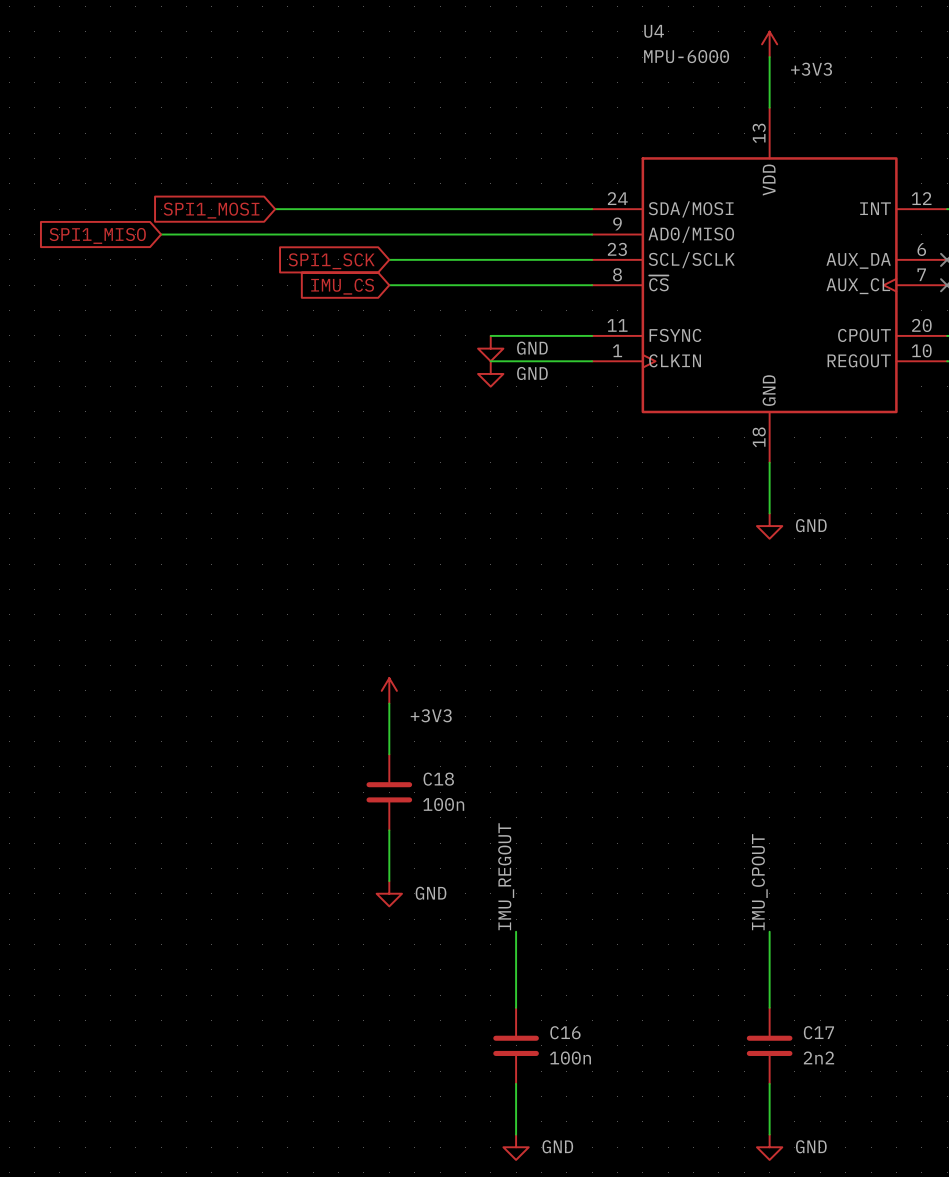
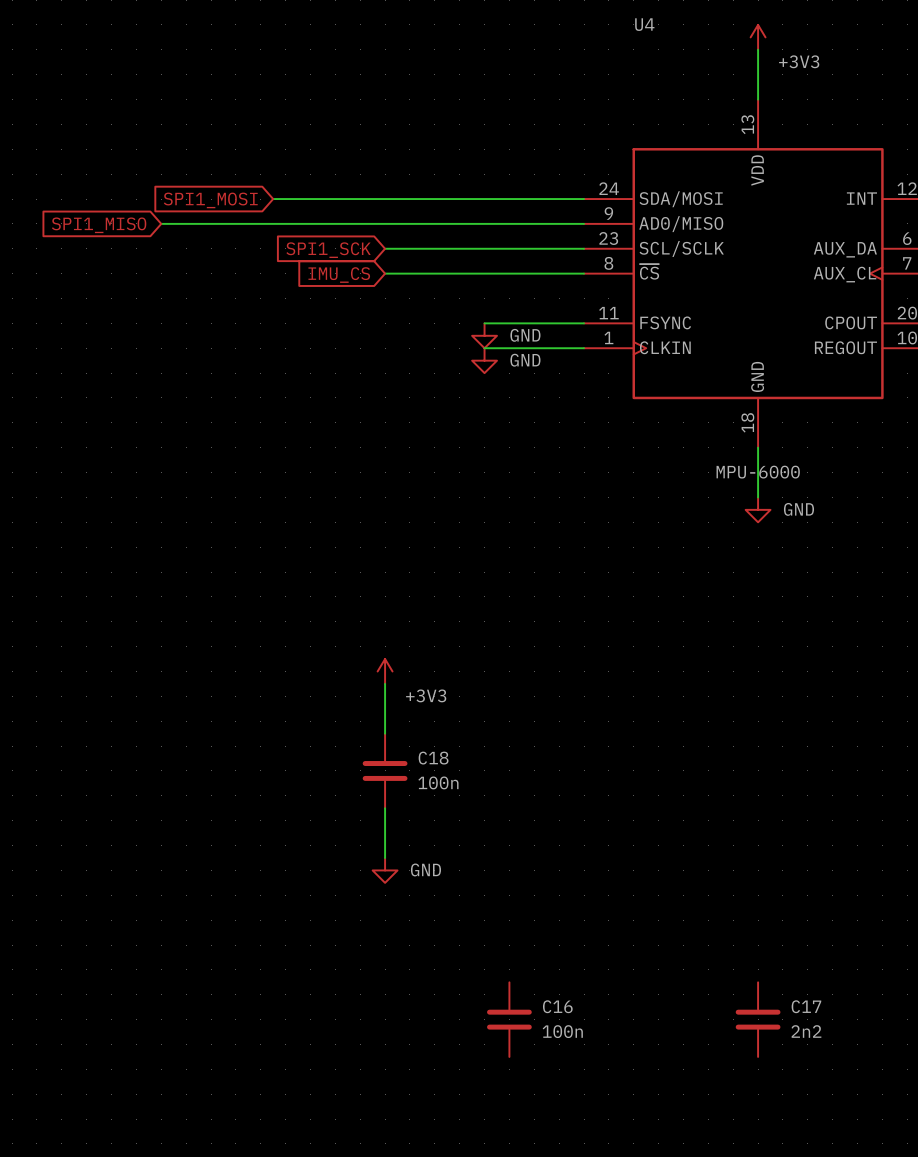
U4 value position: MPU-6000 (686, 56) -> MPU-6000 (758, 472)
label: IMU_REGOUT (506, 876) -> none
label: IMU_CPOUT (759, 882) -> none
wire: (516, 931) (516, 1007) -> none
wire: (769, 931) (769, 1007) -> none
wire: (516, 1083) (516, 1134) -> none
wire: (769, 1083) (769, 1134) -> none
power symbol: GND (516, 1147) -> none
power symbol: GND (769, 1147) -> none

